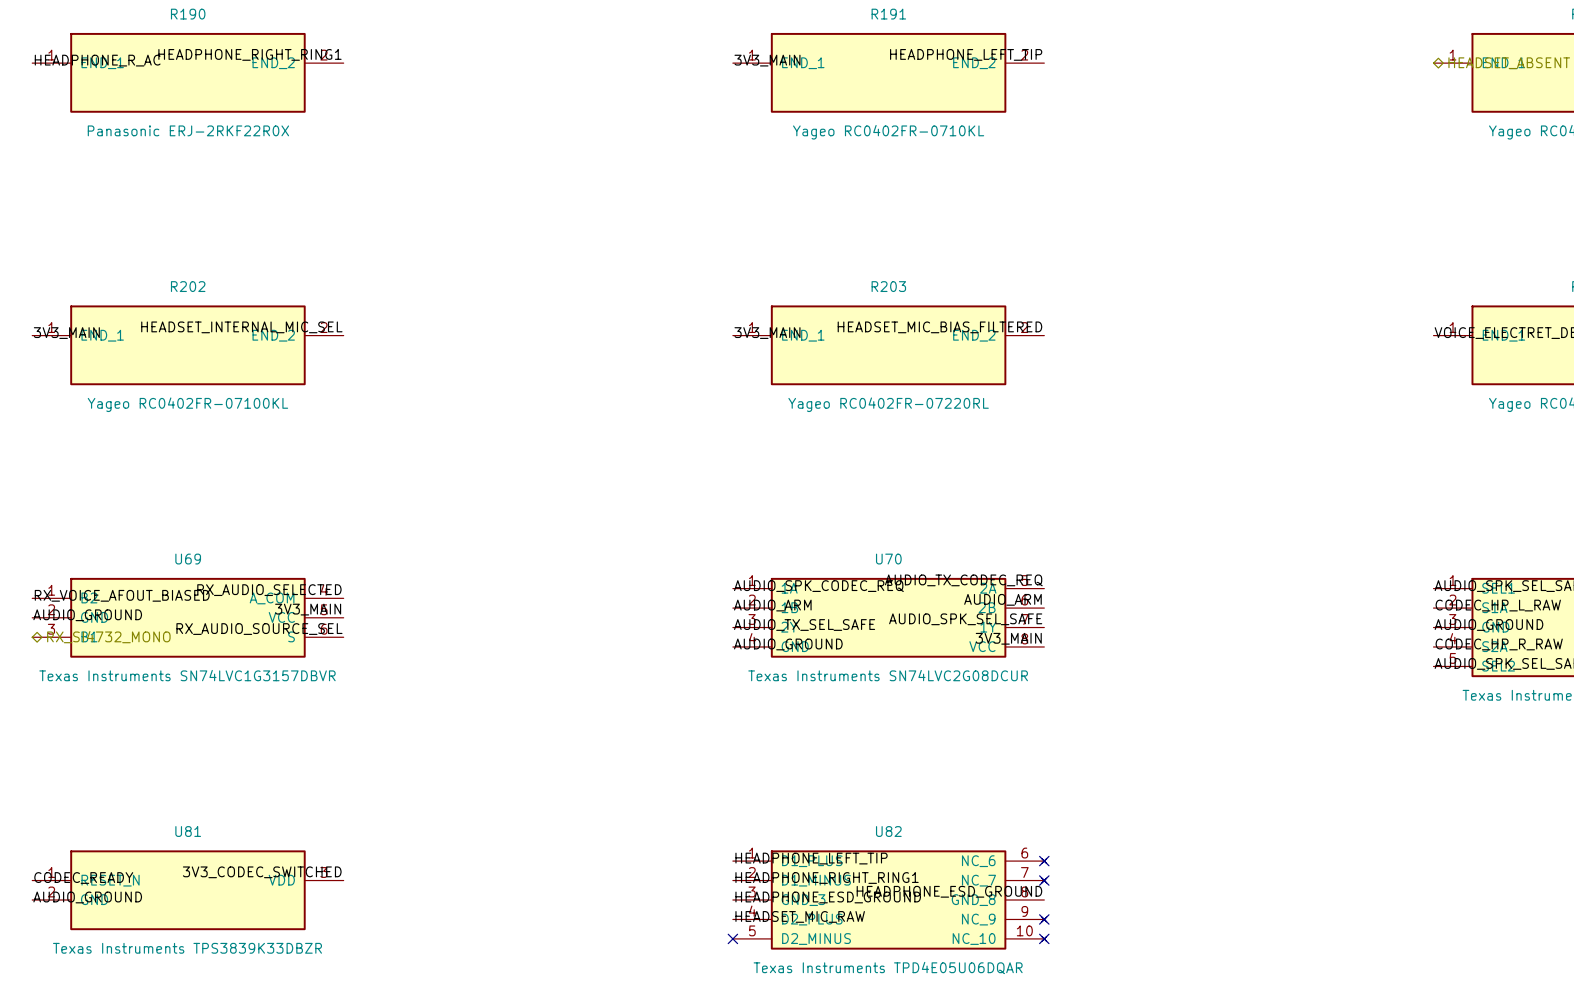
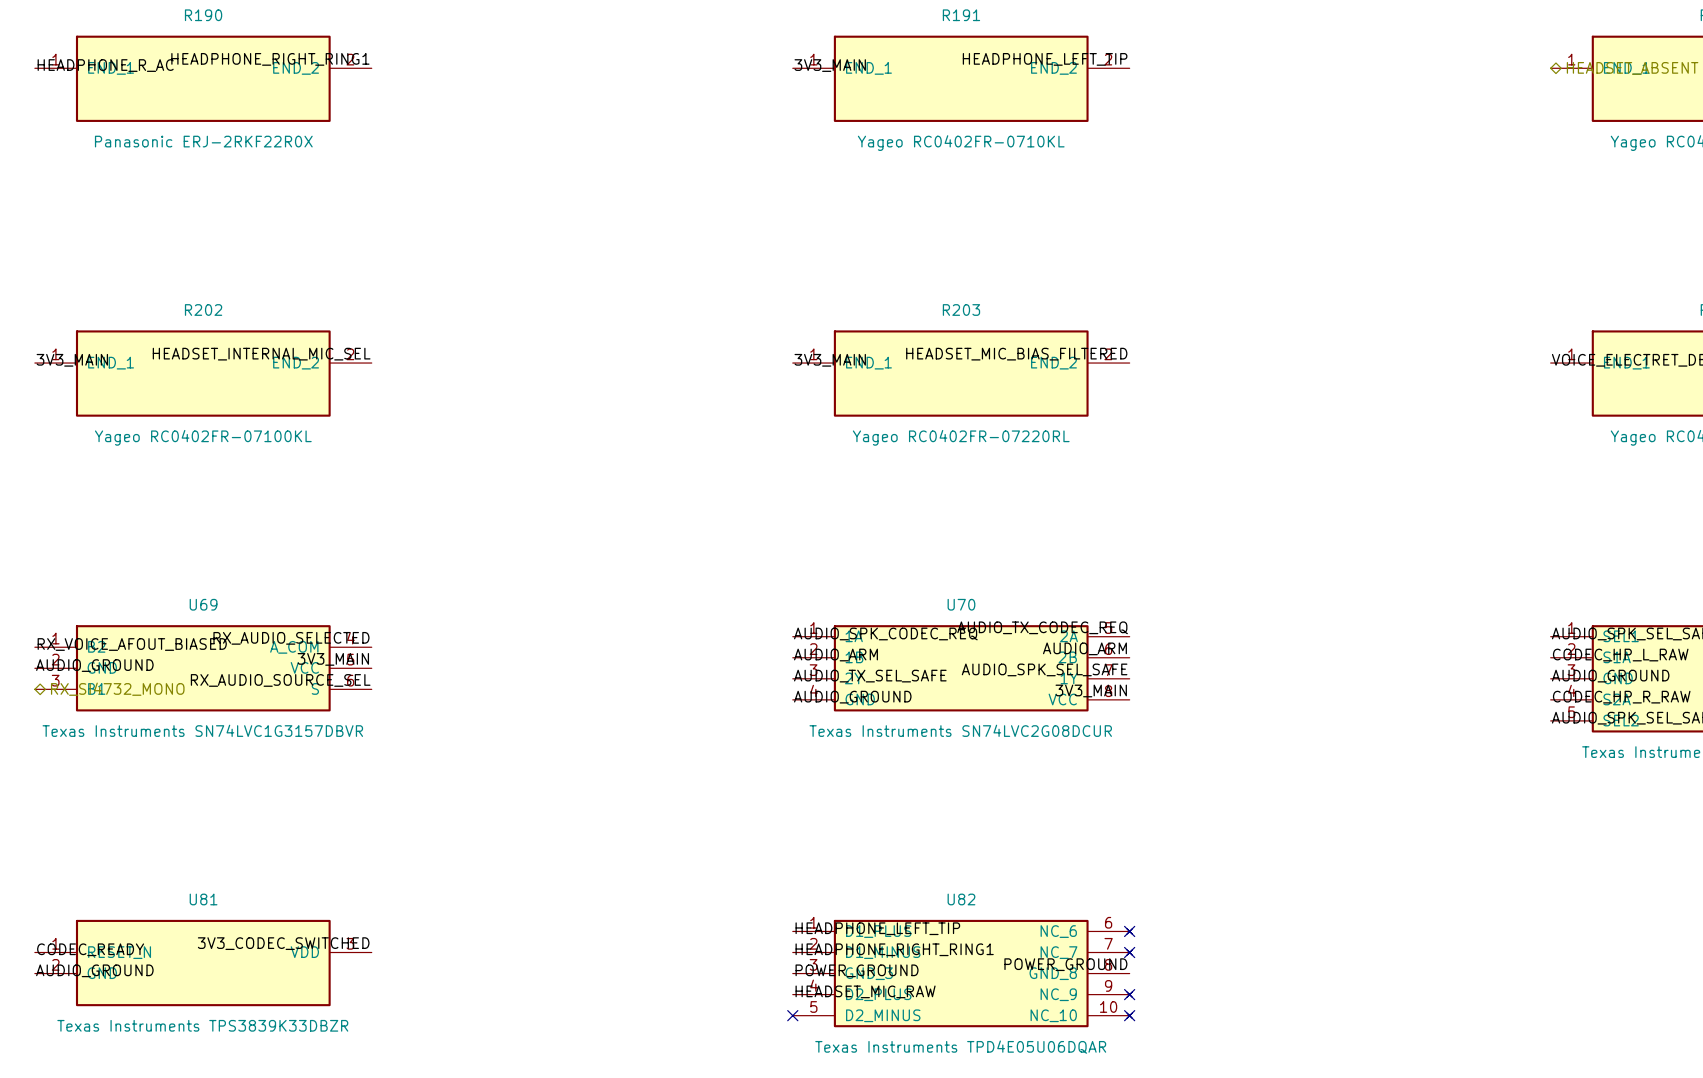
label: HEADPHONE_ESD_GROUND (949, 891) -> POWER_GROUND (1065, 964)
label: HEADPHONE_ESD_GROUND (828, 897) -> POWER_GROUND (857, 970)

